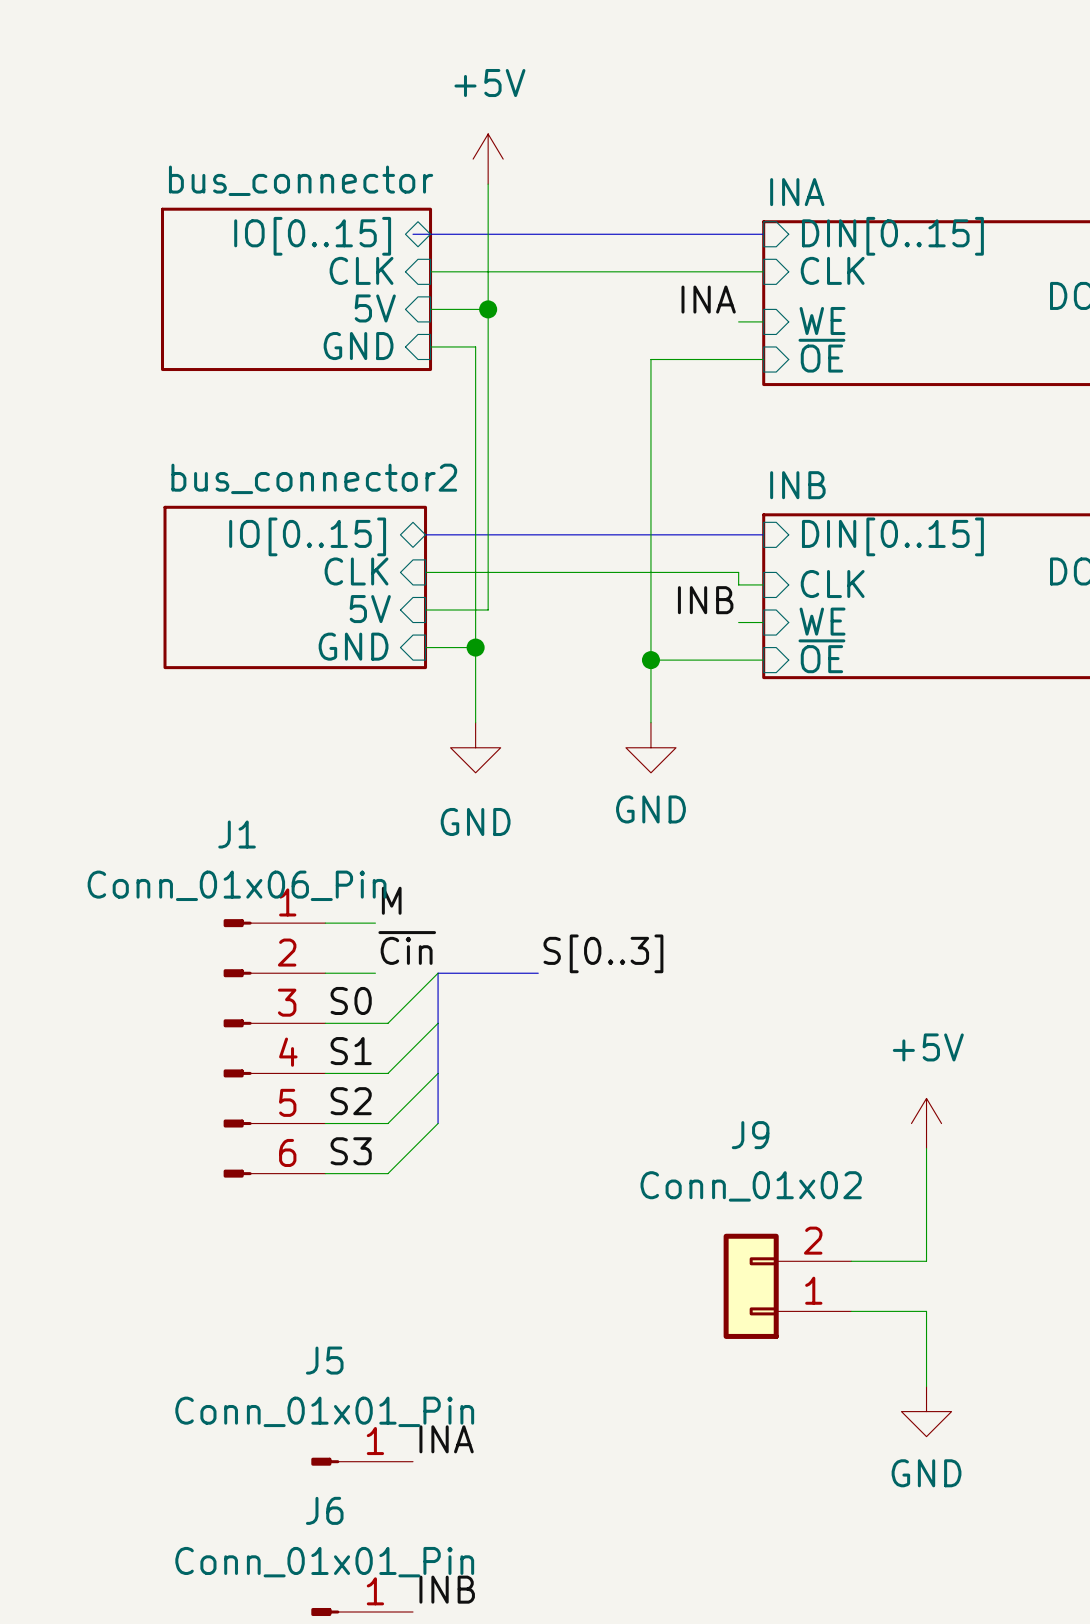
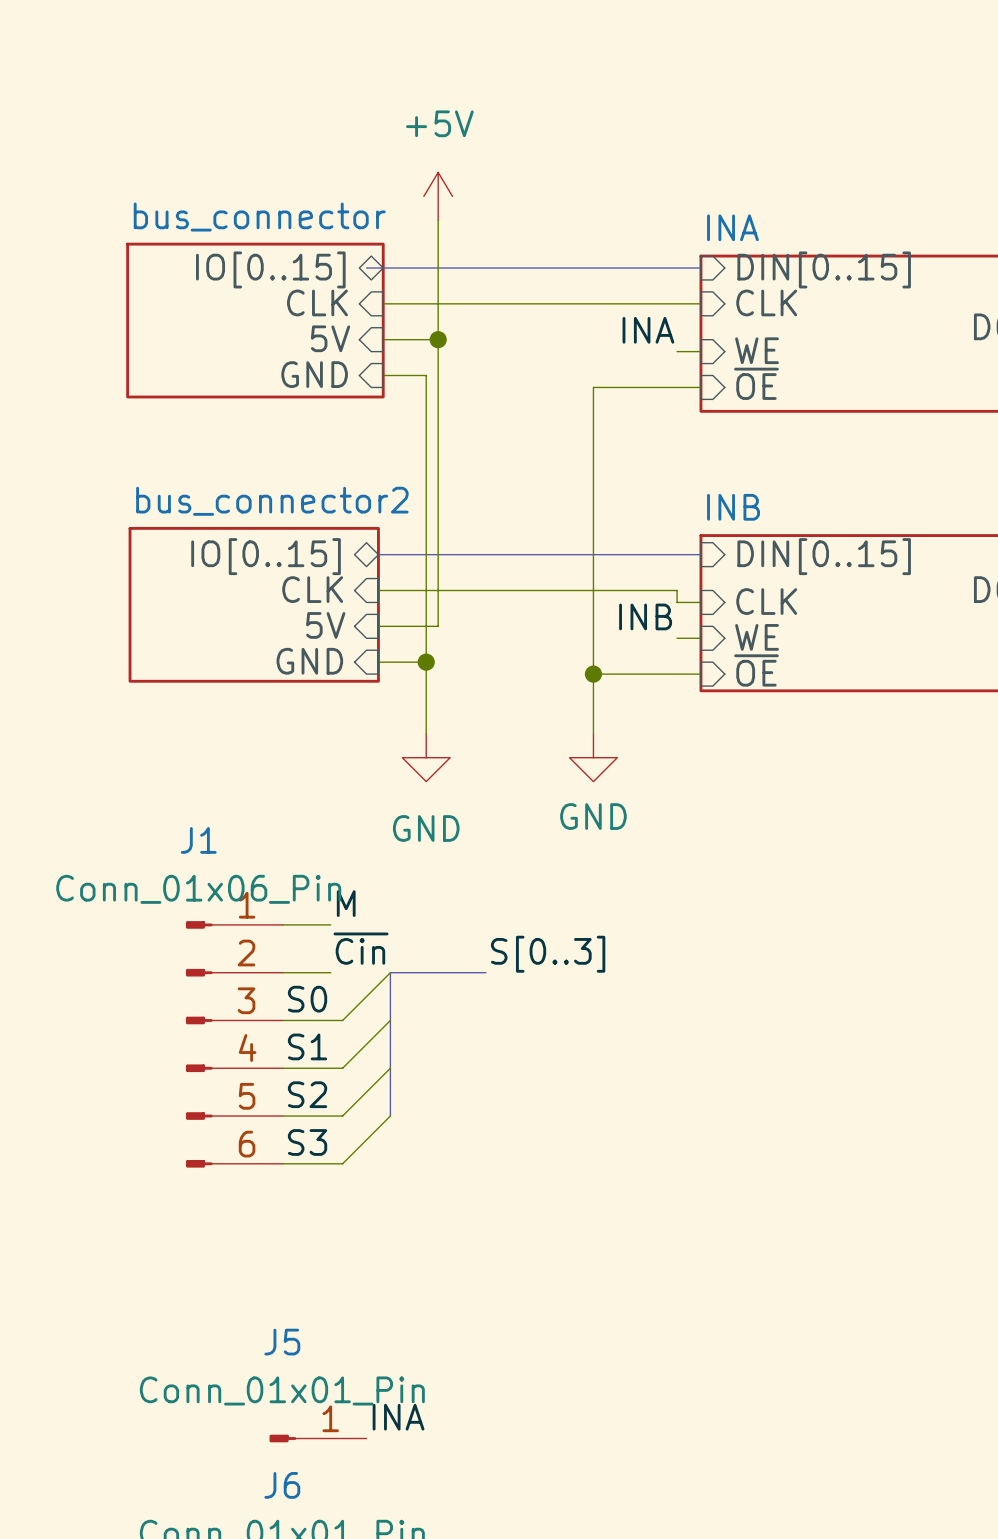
power symbol: +5V (926, 1123) -> none
wire: (926, 1148) (926, 1261) (851, 1261) -> none
J9: Conn_01x02 (787, 1286) -> none
wire: (851, 1311) (926, 1311) (926, 1386) -> none
power symbol: GND (926, 1411) -> none

